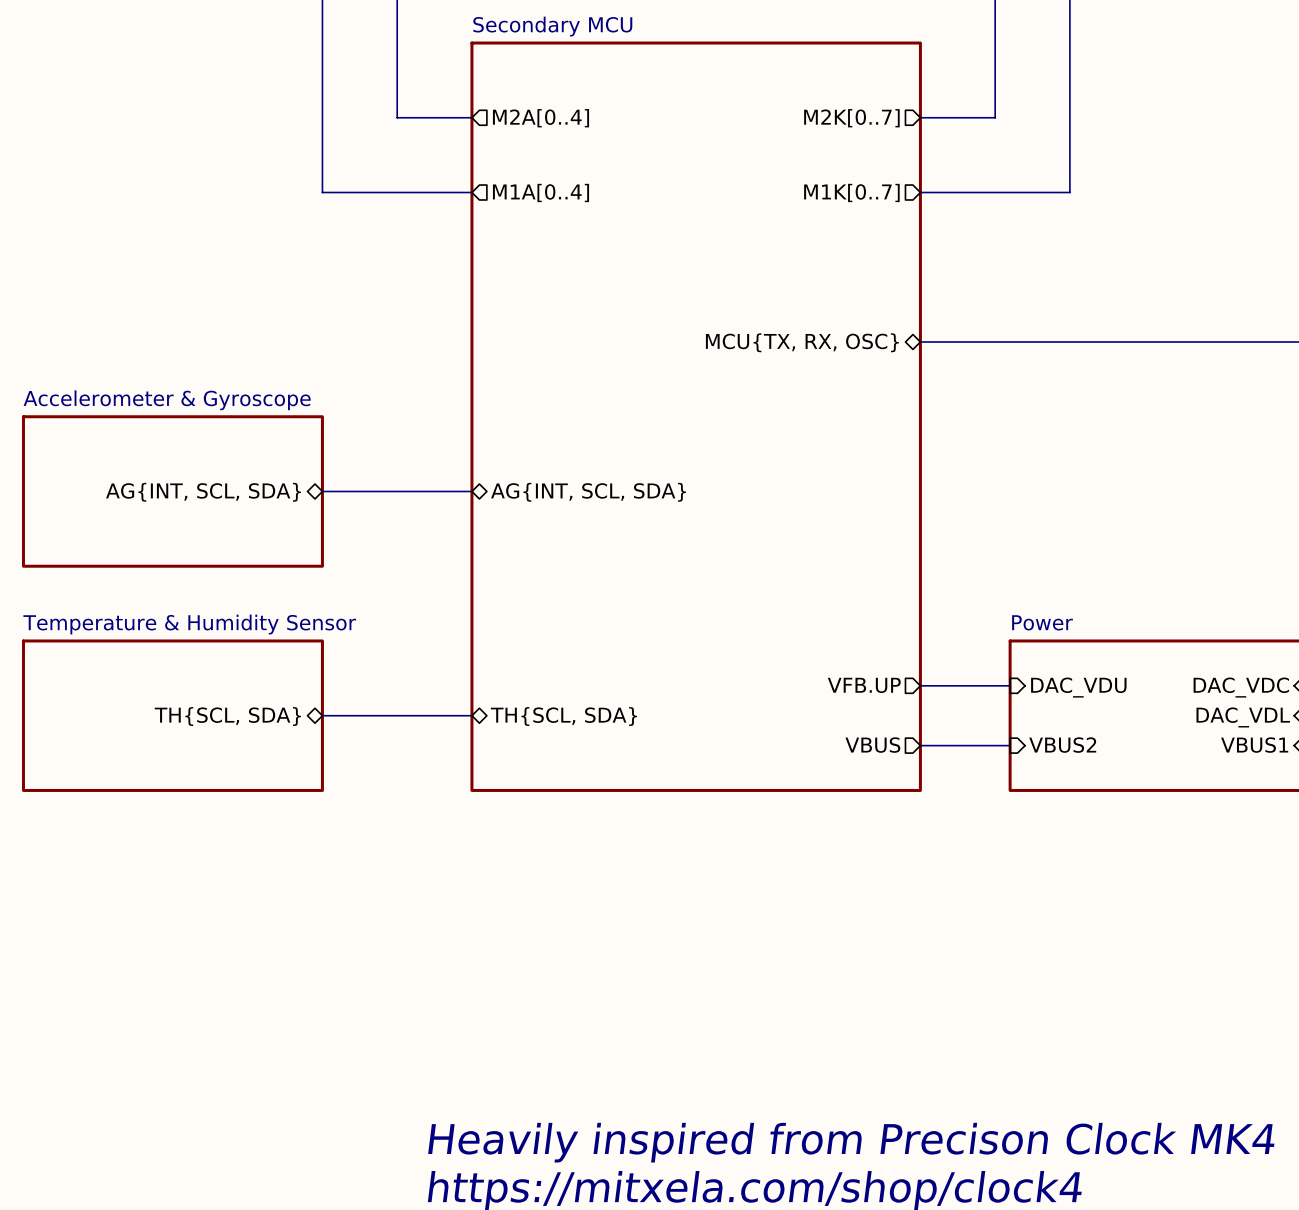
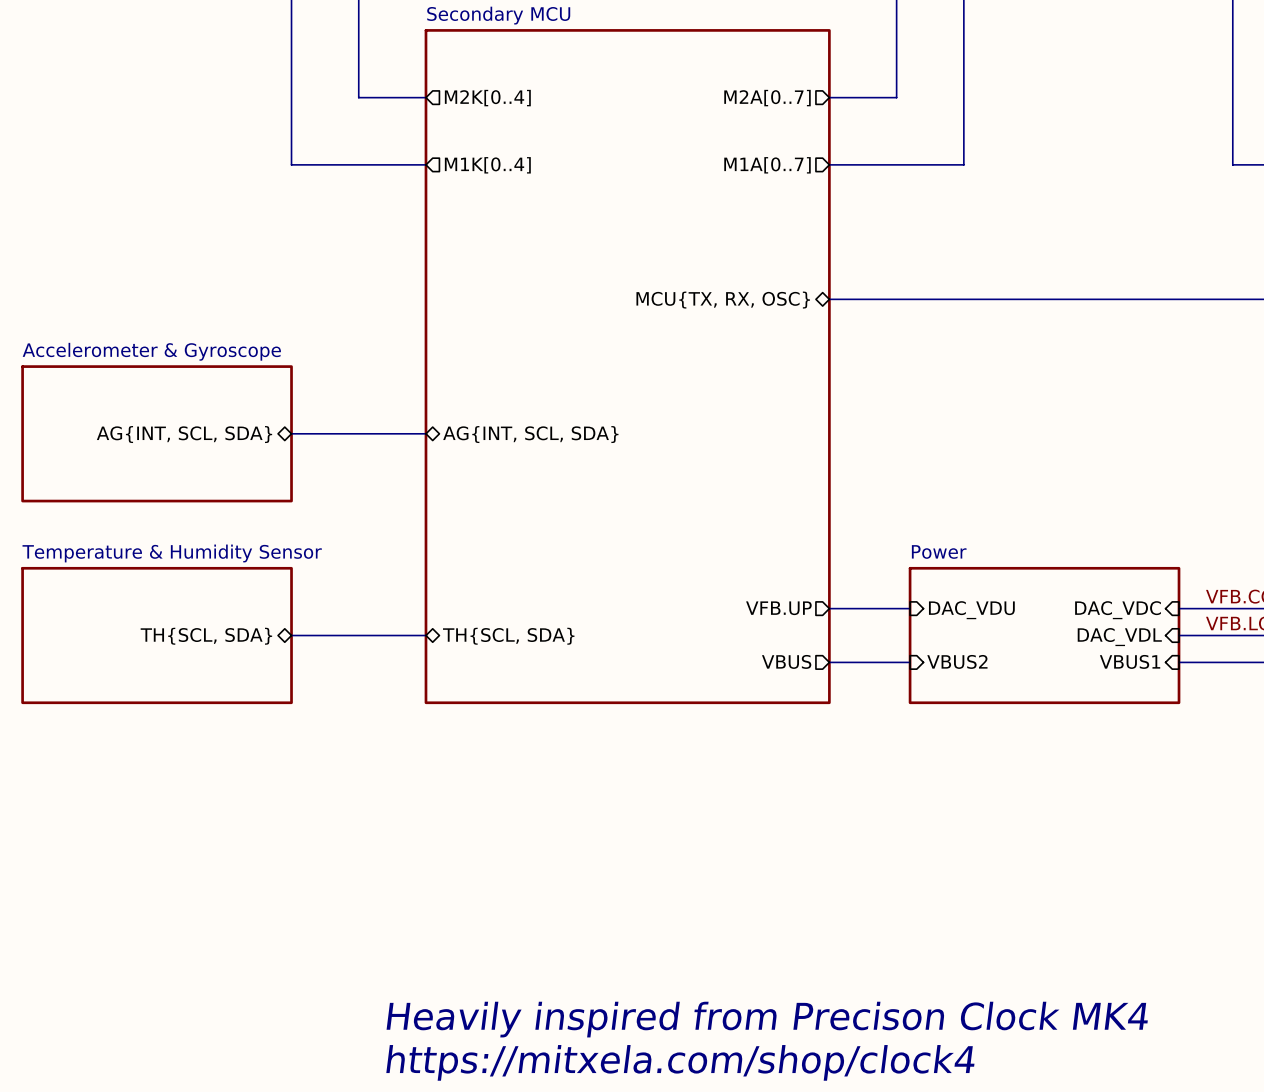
sheet pin: M2A[0..4] (541, 118) -> M2K[0..4] (487, 98)
sheet pin: M2K[0..7] (851, 118) -> M2A[0..7] (767, 98)
sheet pin: M1A[0..4] (541, 192) -> M1K[0..4] (487, 165)
sheet pin: M1K[0..7] (851, 192) -> M1A[0..7] (767, 165)

